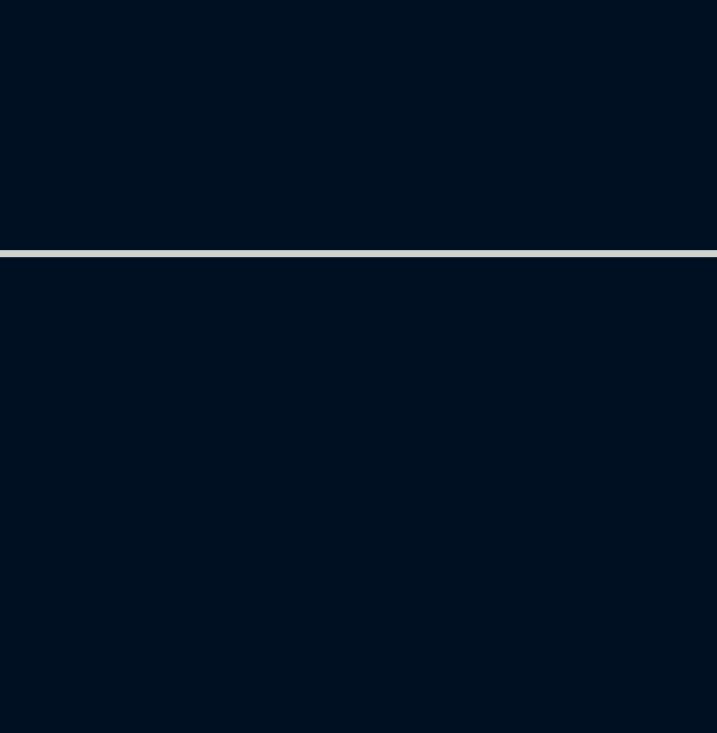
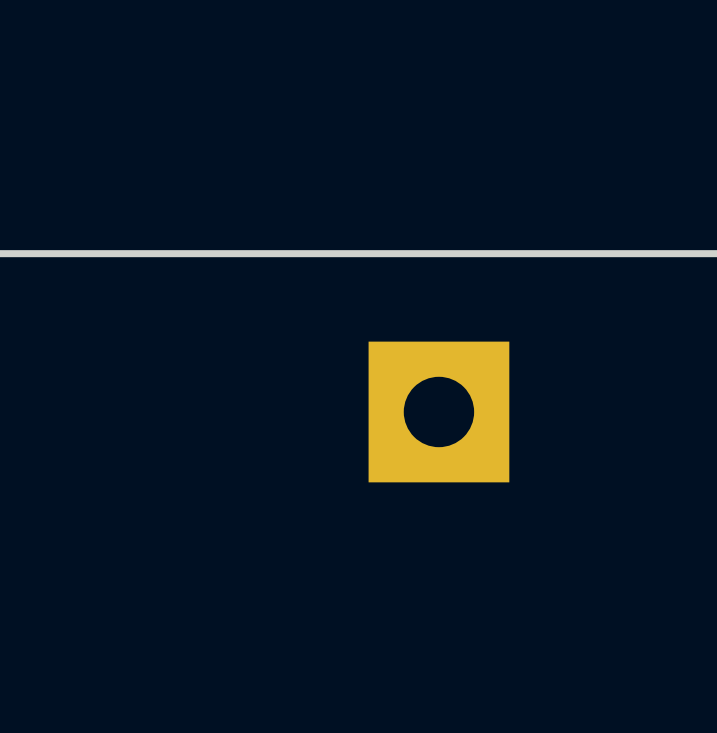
part: none -> (438, 411)

